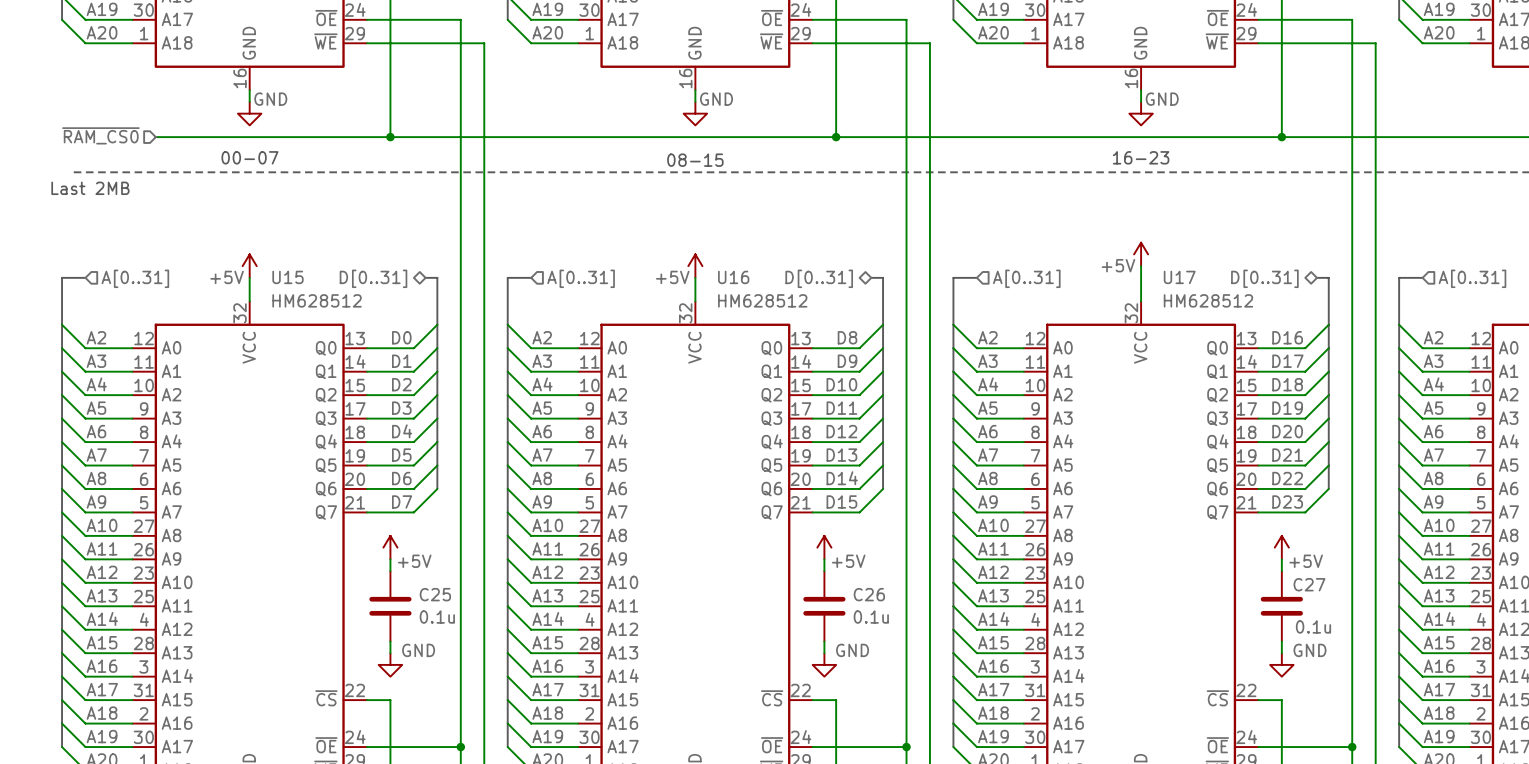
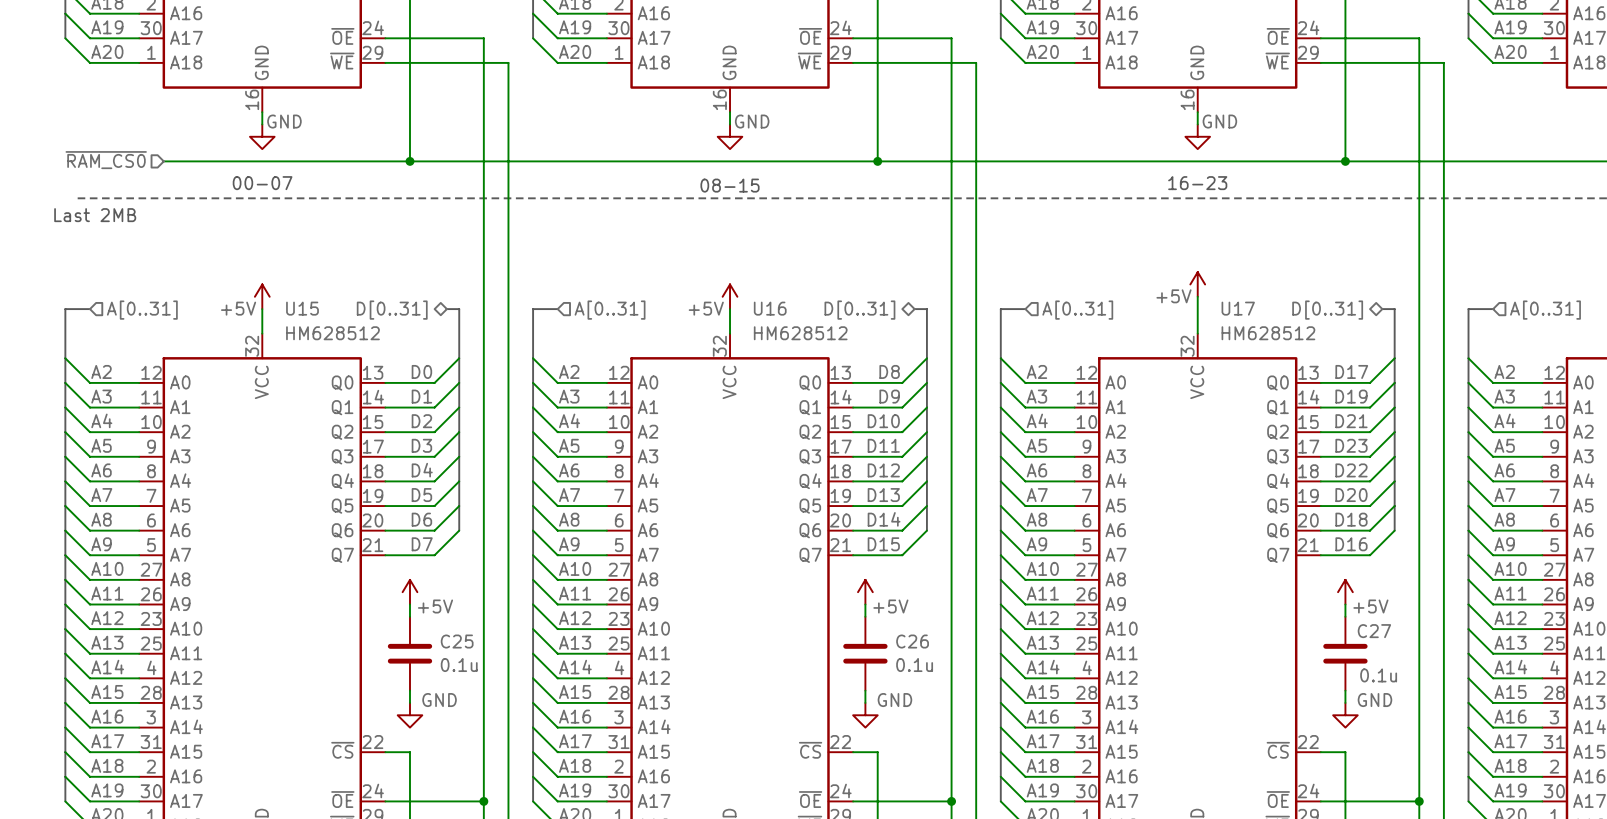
label: D16 (1287, 337) -> D17 (1351, 371)
label: D17 (1287, 361) -> D19 (1351, 396)
label: D18 (1287, 384) -> D21 (1351, 421)
label: D19 (1287, 408) -> D23 (1351, 445)
label: D20 (1287, 431) -> D22 (1351, 470)
label: D21 (1287, 455) -> D20 (1351, 495)
label: D22 (1287, 478) -> D18 (1351, 519)
label: D23 (1287, 501) -> D16 (1351, 544)

